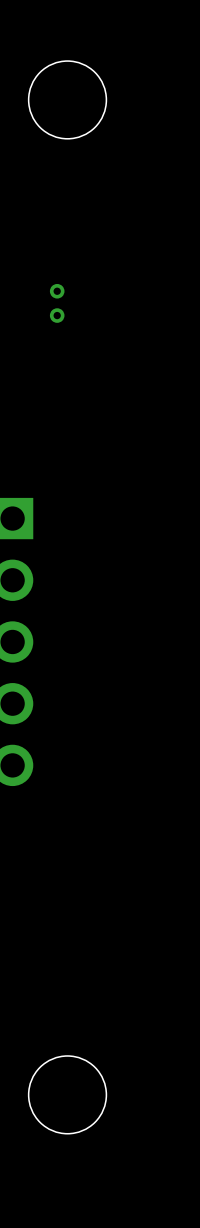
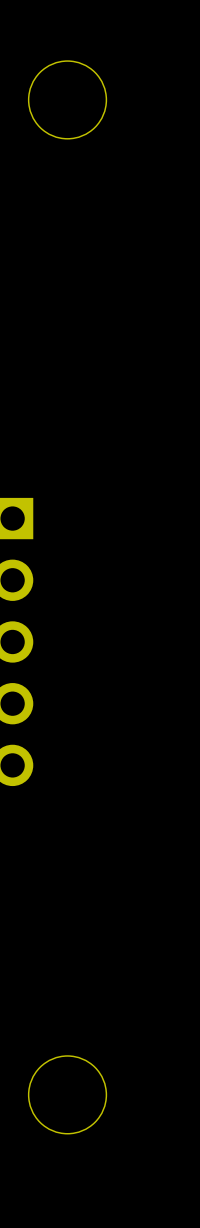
via: (57, 291) -> none
via: (57, 315) -> none

